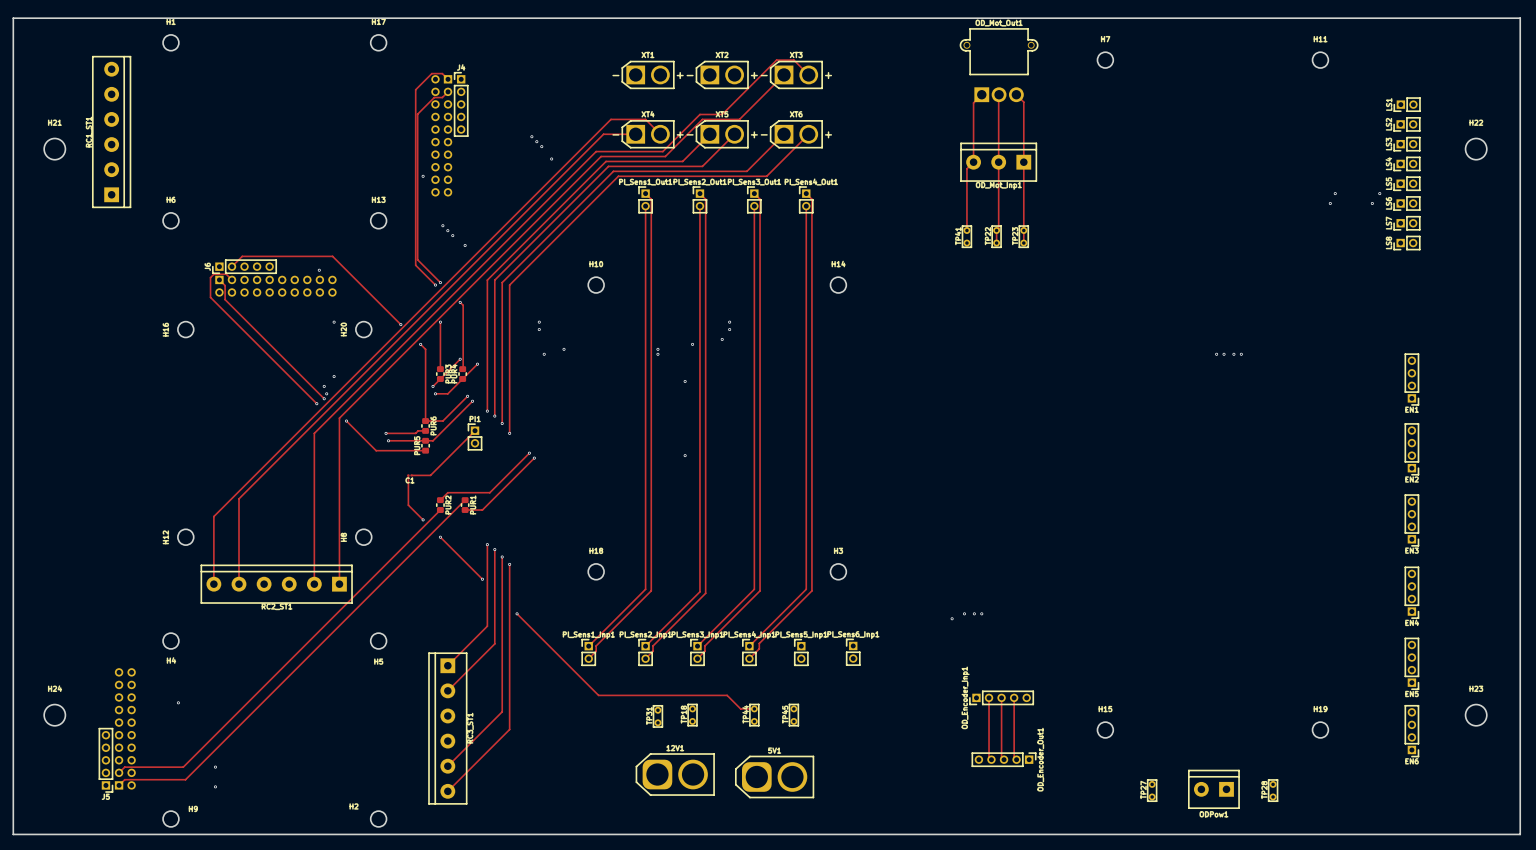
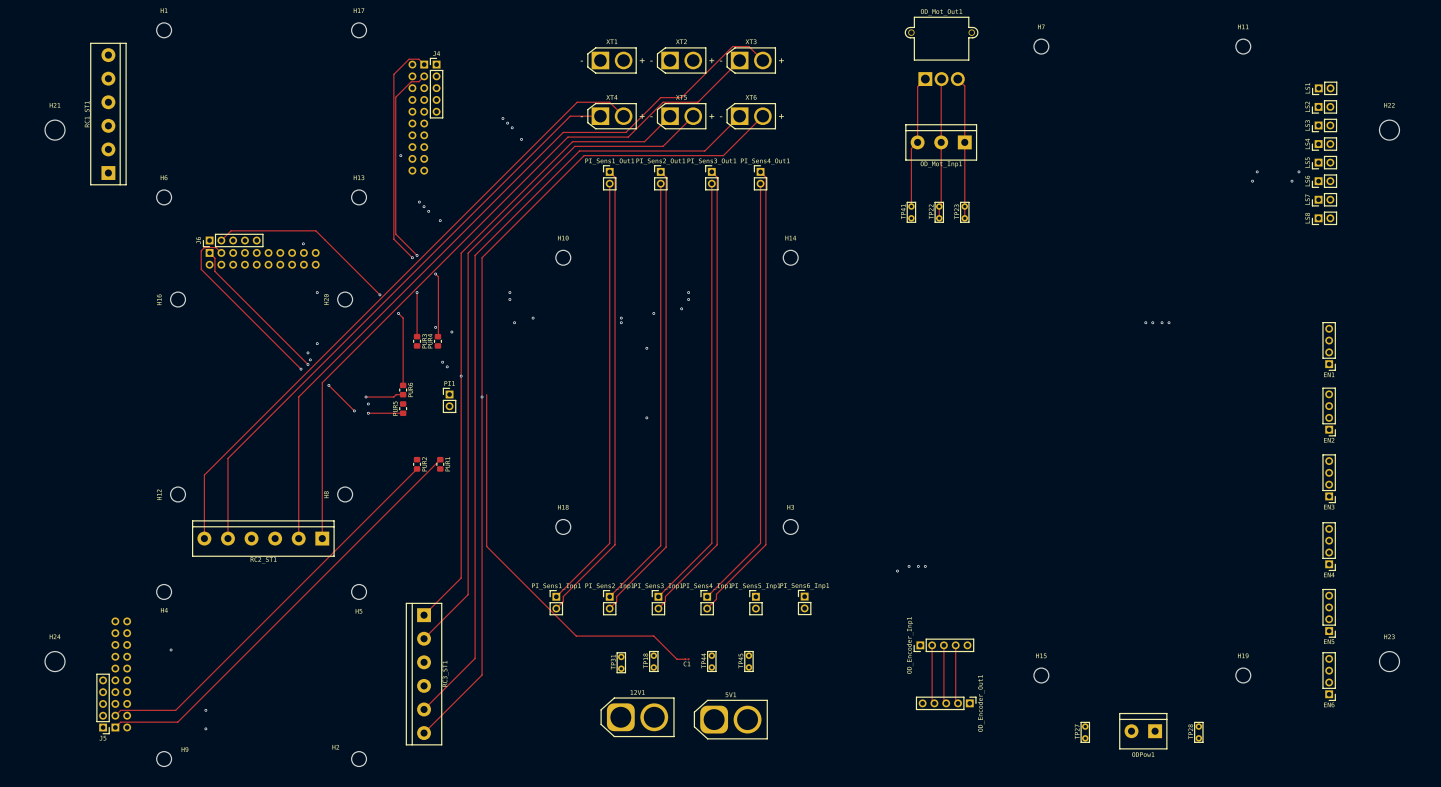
board edge: (13, 18) (1520, 18) (1520, 834) (13, 834) (13, 18) -> none
track: (460, 359) (433, 386) -> none
track: (477, 364) (447, 393) (435, 393) -> none
via: (433, 386) -> none
via: (435, 393) -> none
track: (467, 396) (442, 421) (425, 421) -> none
track: (472, 401) (433, 440) (388, 440) -> none
track: none -> (461, 376) (461, 501)
track: none -> (468, 380) (468, 506)
via: (494, 416) -> none
track: none -> (475, 387) (475, 513)
via: (502, 423) -> none
track: (475, 430) (430, 475) (411, 475) -> none
track: none -> (486, 394) (486, 546) (576, 636) (653, 636) (677, 659) (685, 659)
track: none -> (482, 397) (482, 520)
track: (373, 448) (376, 450) (388, 450) -> none
via: none -> (354, 410)
via: none -> (368, 413)
track: (529, 453) (489, 492) (447, 492) (440, 500) -> none
via: (529, 453) -> none
track: (534, 458) (482, 510) (465, 510) -> none
via: (534, 458) -> none
track: (408, 475) (408, 505) (423, 519) -> none
part position: (409, 475) -> (687, 659)
via: (423, 519) -> none
track: (440, 537) (482, 579) -> none
via: (440, 537) -> none
via: (487, 544) -> none
via: (494, 549) -> none
via: (502, 556) -> none
via: (509, 564) -> none
via: (482, 579) -> none
track: (517, 613) (598, 695) (727, 695) (740, 708) (754, 708) -> none
via: (517, 613) -> none

